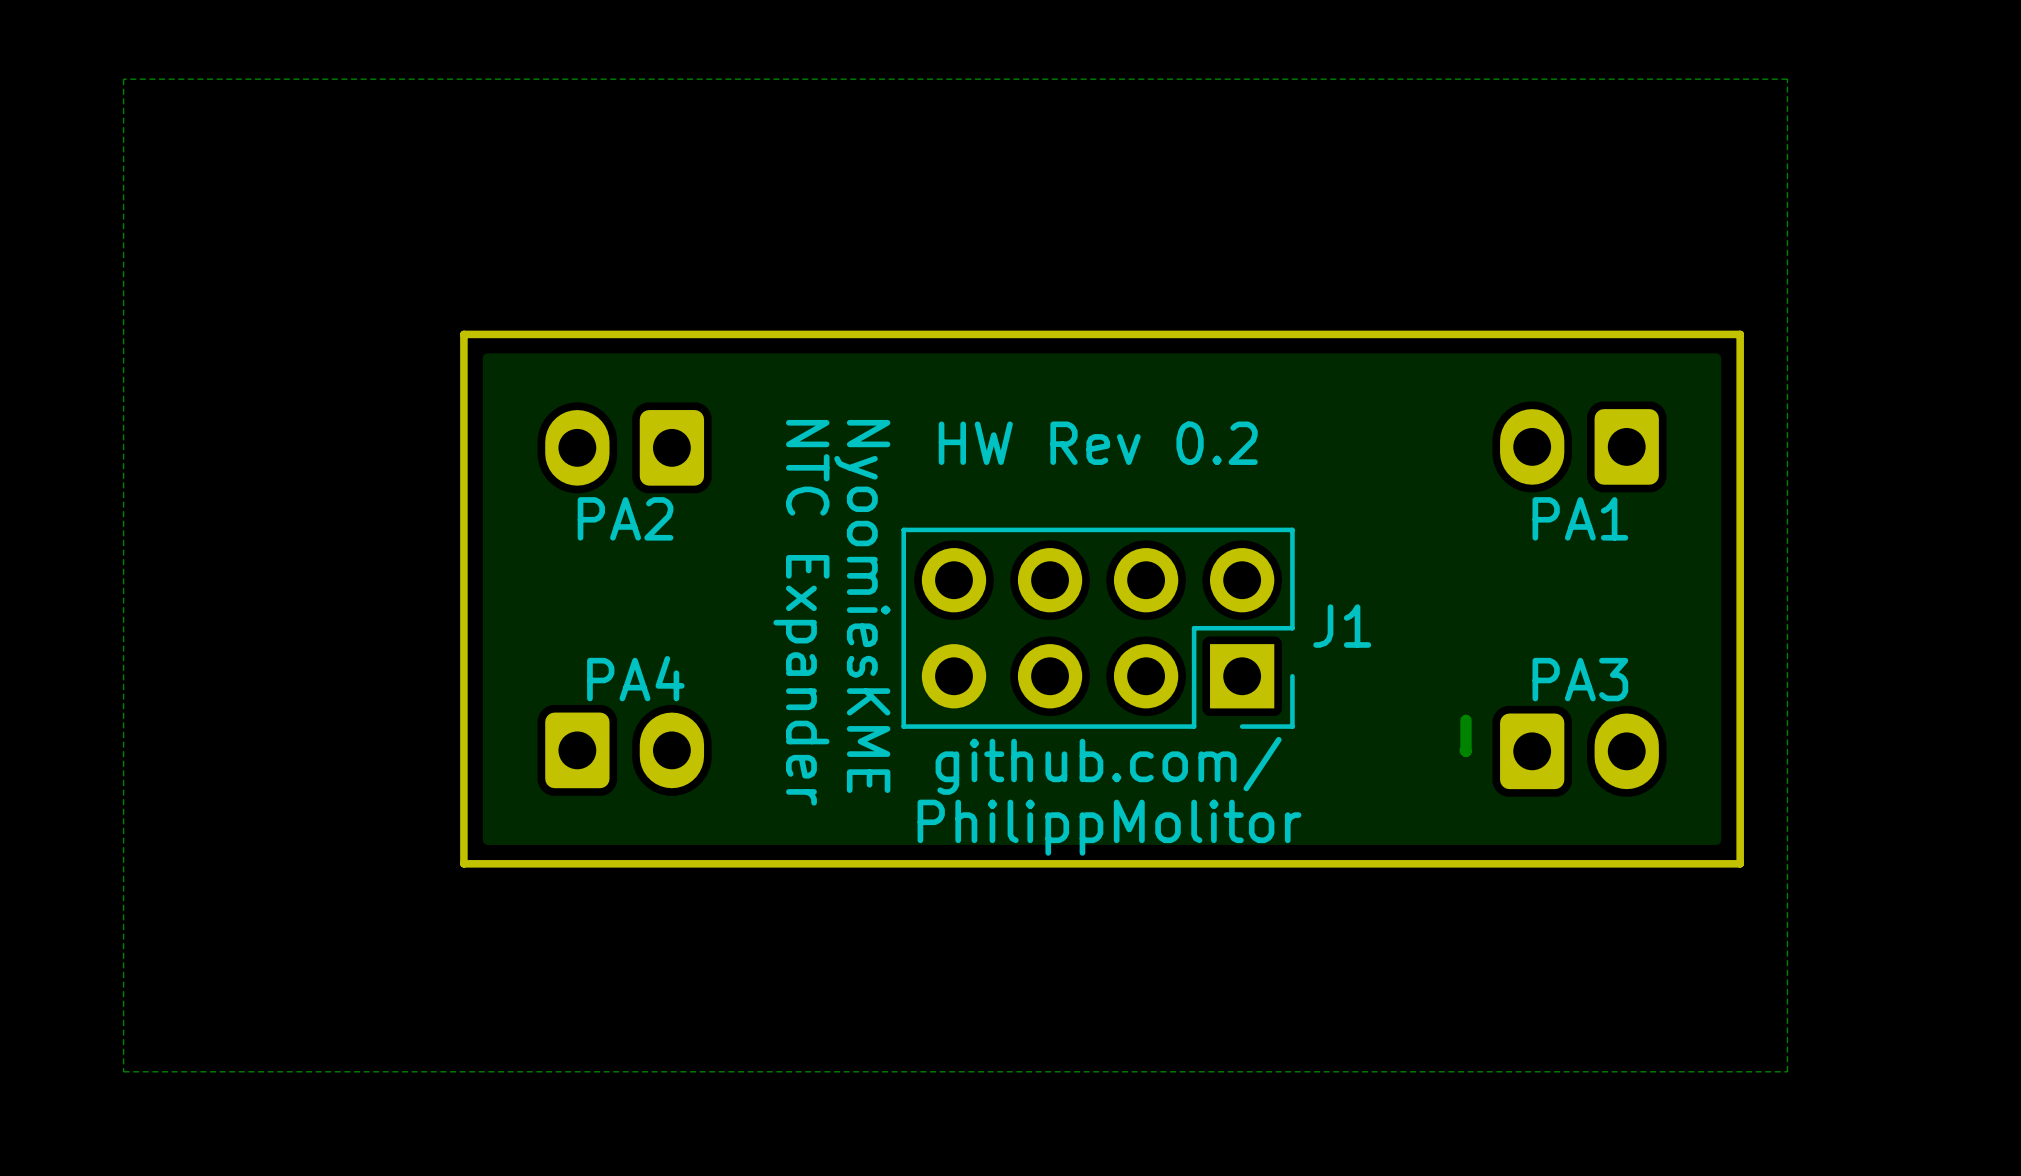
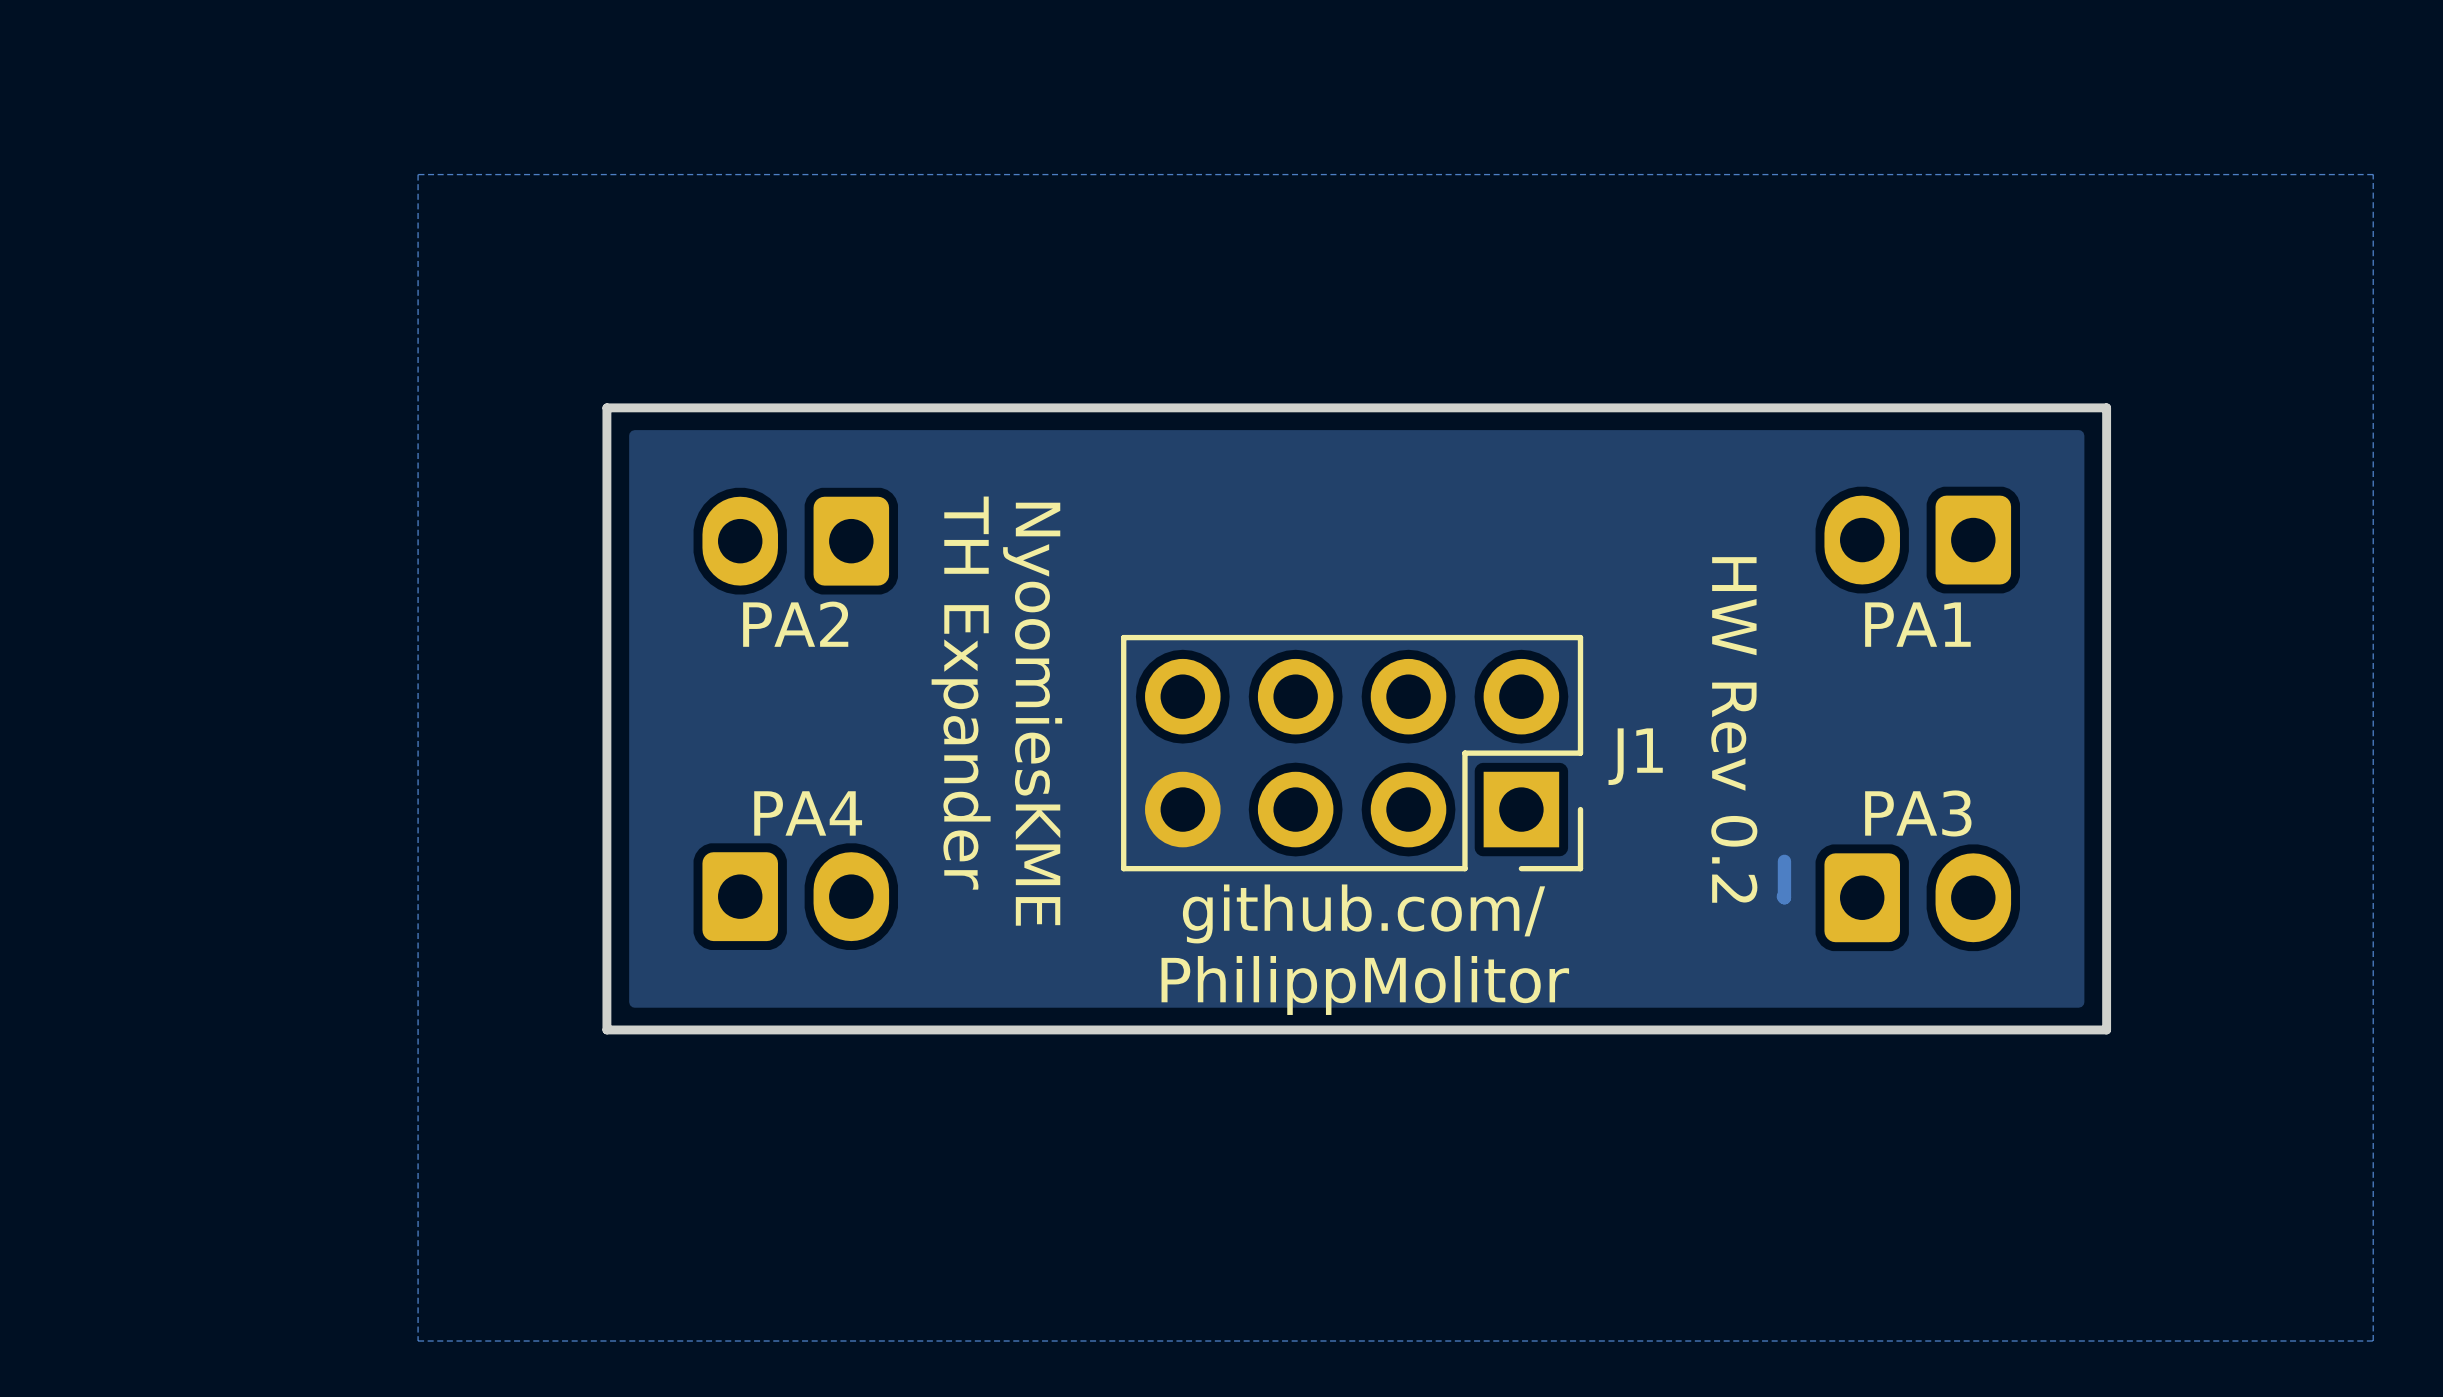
zone outline: (1787, 79) (1787, 1071) (123, 1071) (123, 79) (1787, 79) -> (2373, 174) (2373, 1341) (418, 1341) (418, 174) (2373, 174)
text rotation: 0° (1098, 443) -> 90° clockwise (1734, 729)
text position: NyoomiesKME (862, 606) -> NyoomiesKME (1032, 714)
text: NTC Expander (801, 612) -> TH Expander (961, 693)

